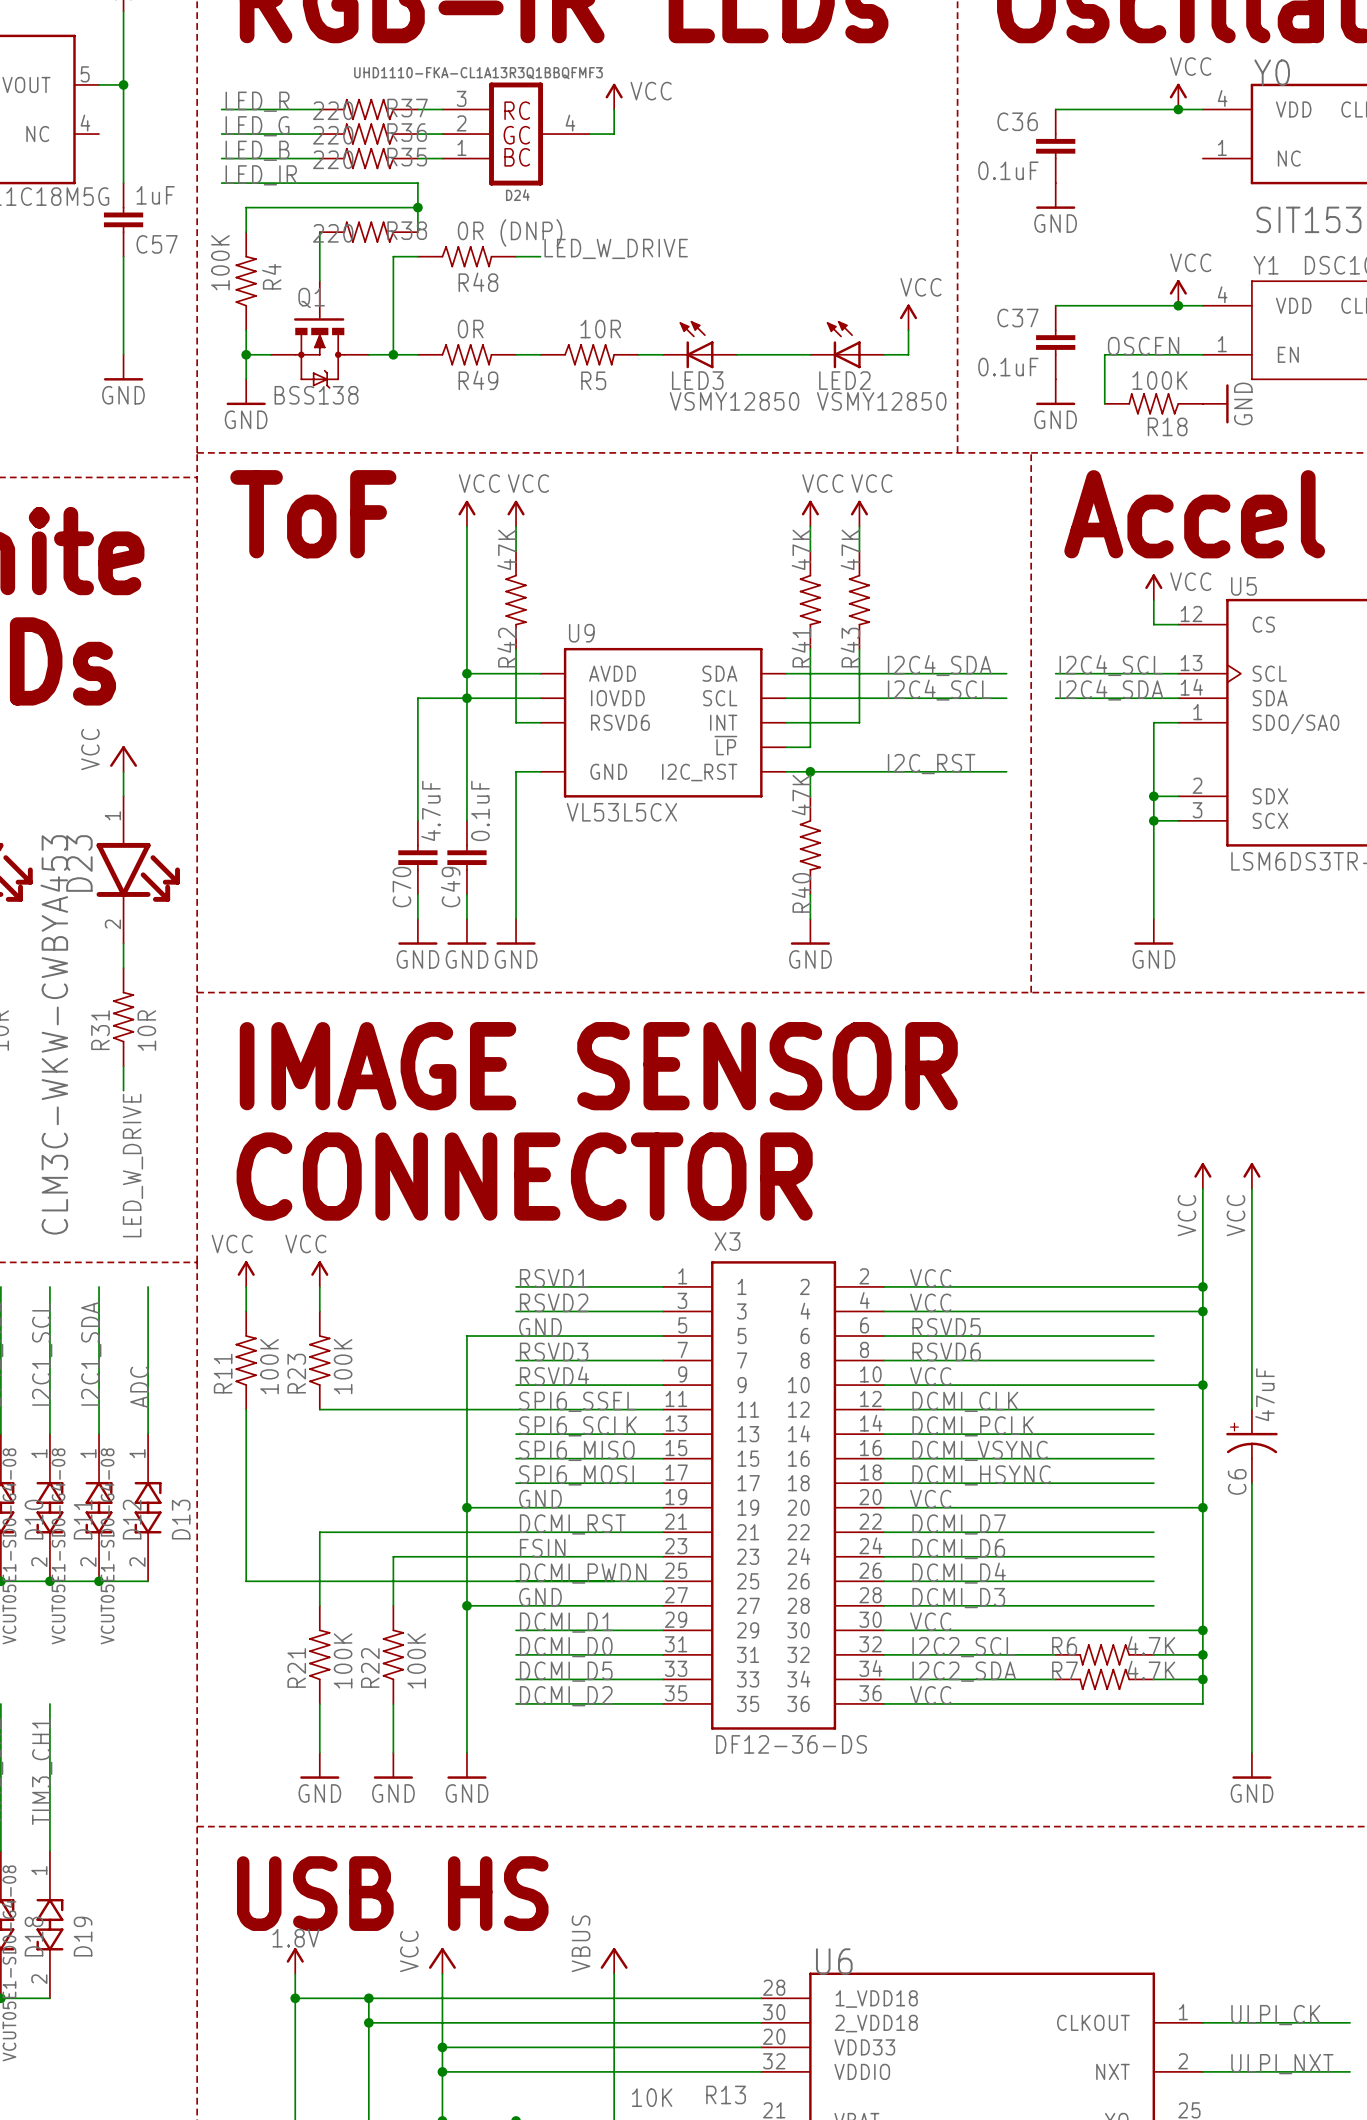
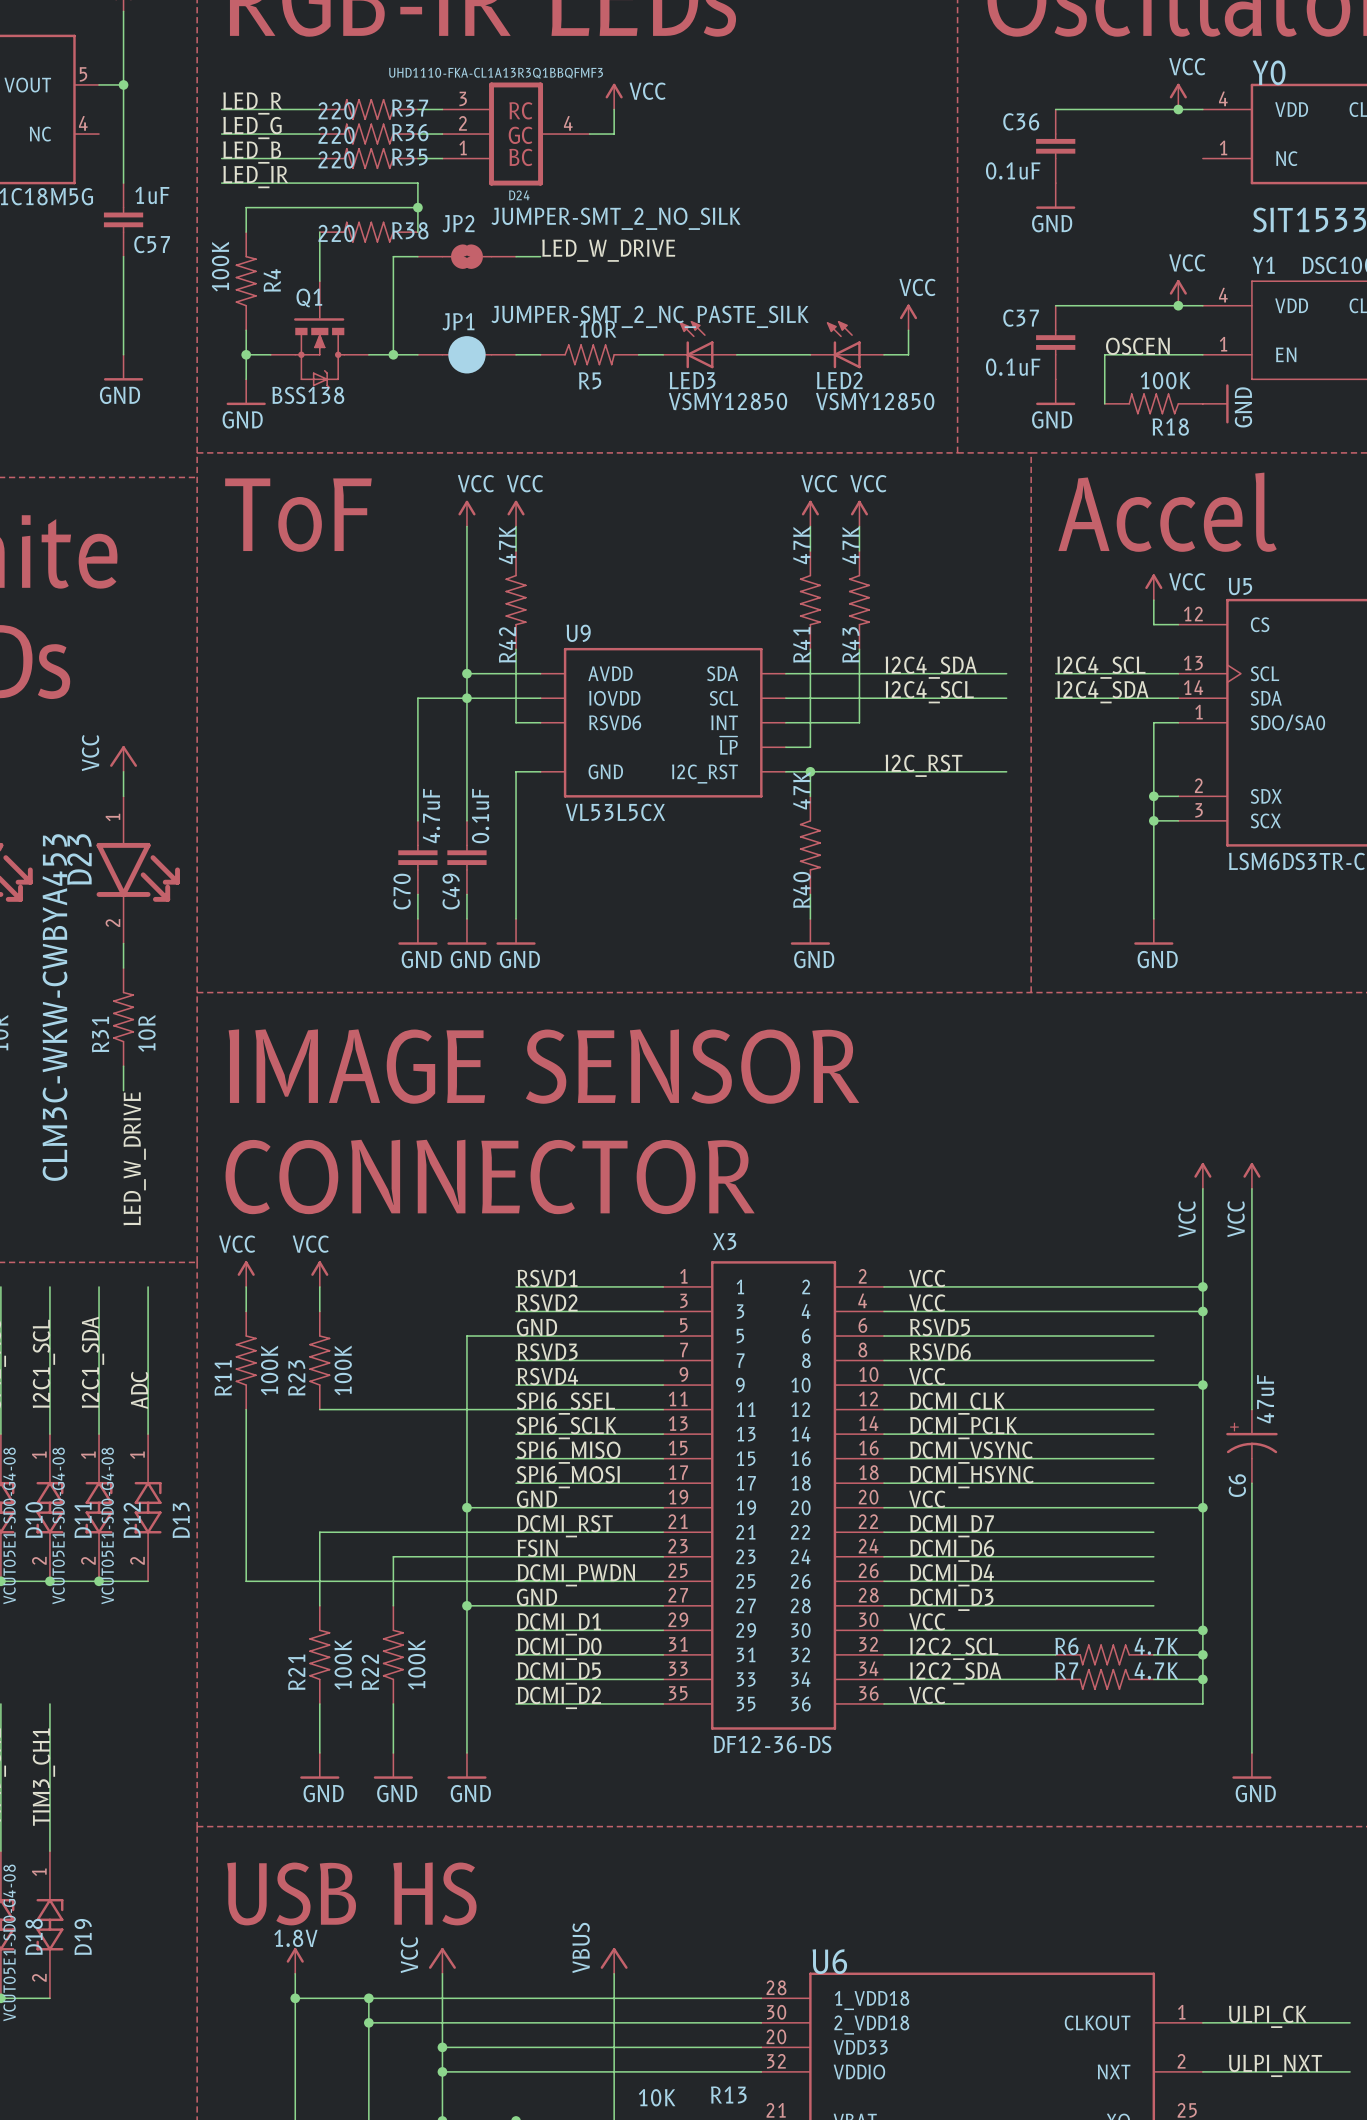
R48: 0R (DNP) (466, 256) -> none
JP2: none -> JUMPER-SMT_2_NO_SILK (466, 256)
R49: 0R (466, 354) -> none
JP1: none -> JUMPER-SMT_2_NC_PASTE_SILK (466, 354)

